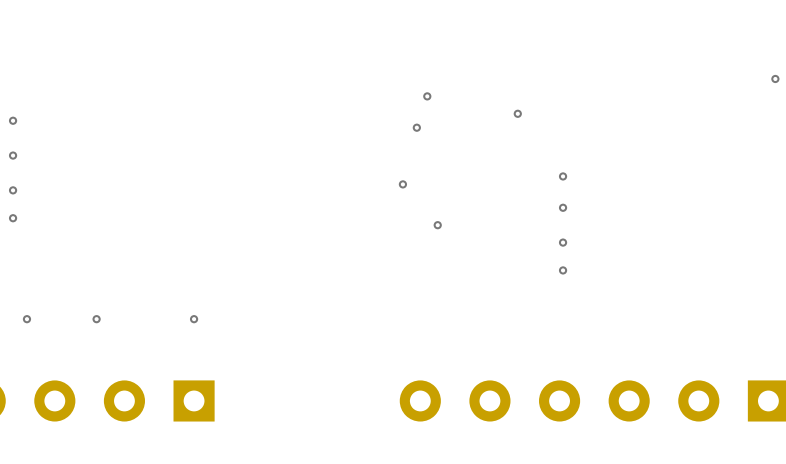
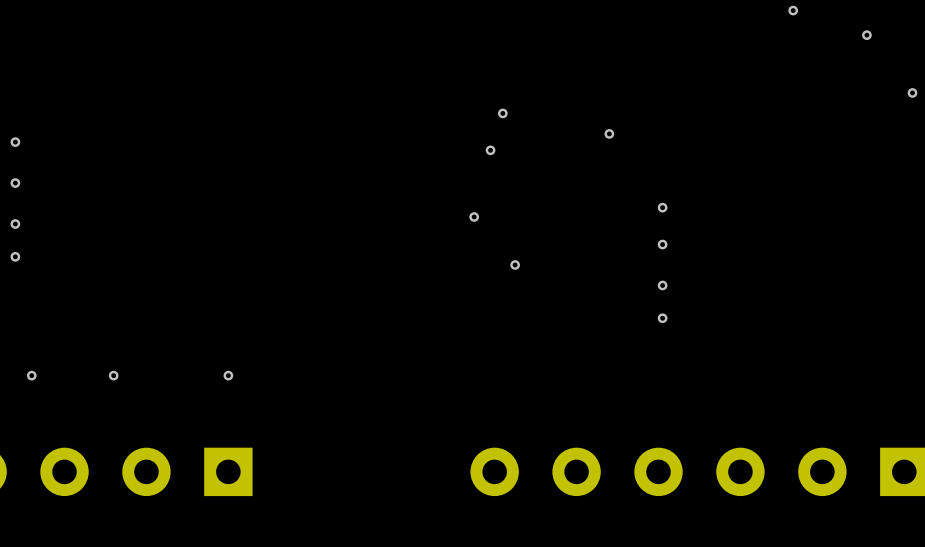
via: none -> (793, 10)
via: none -> (866, 35)

